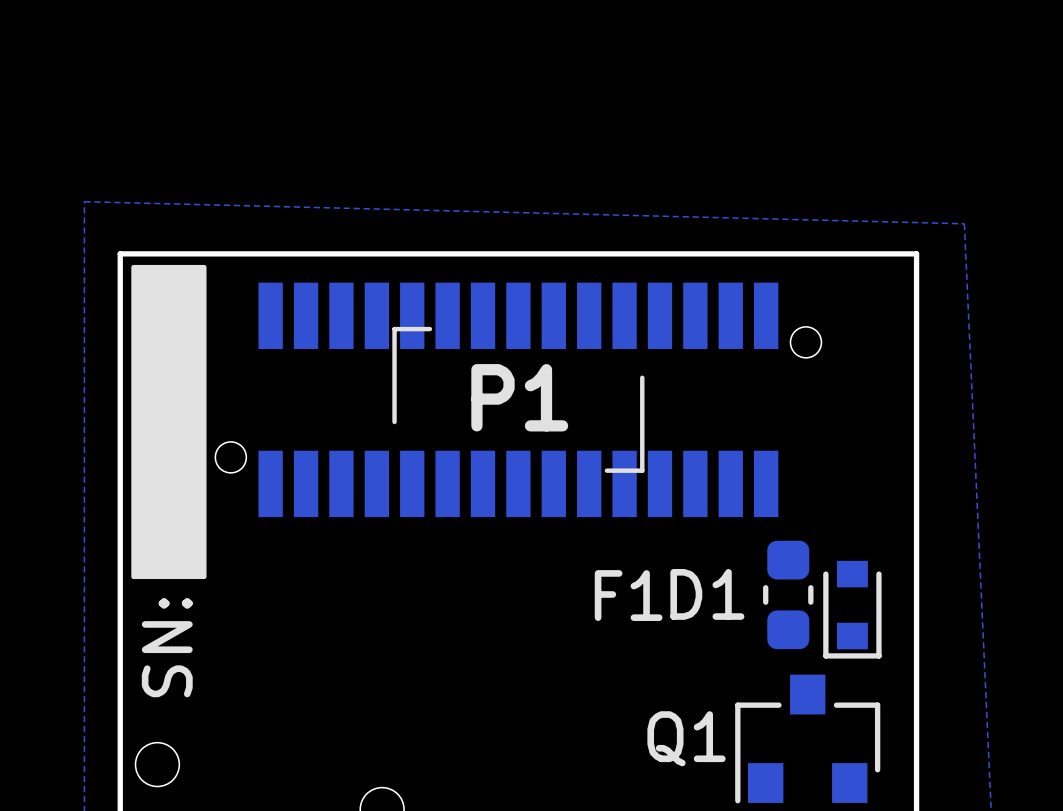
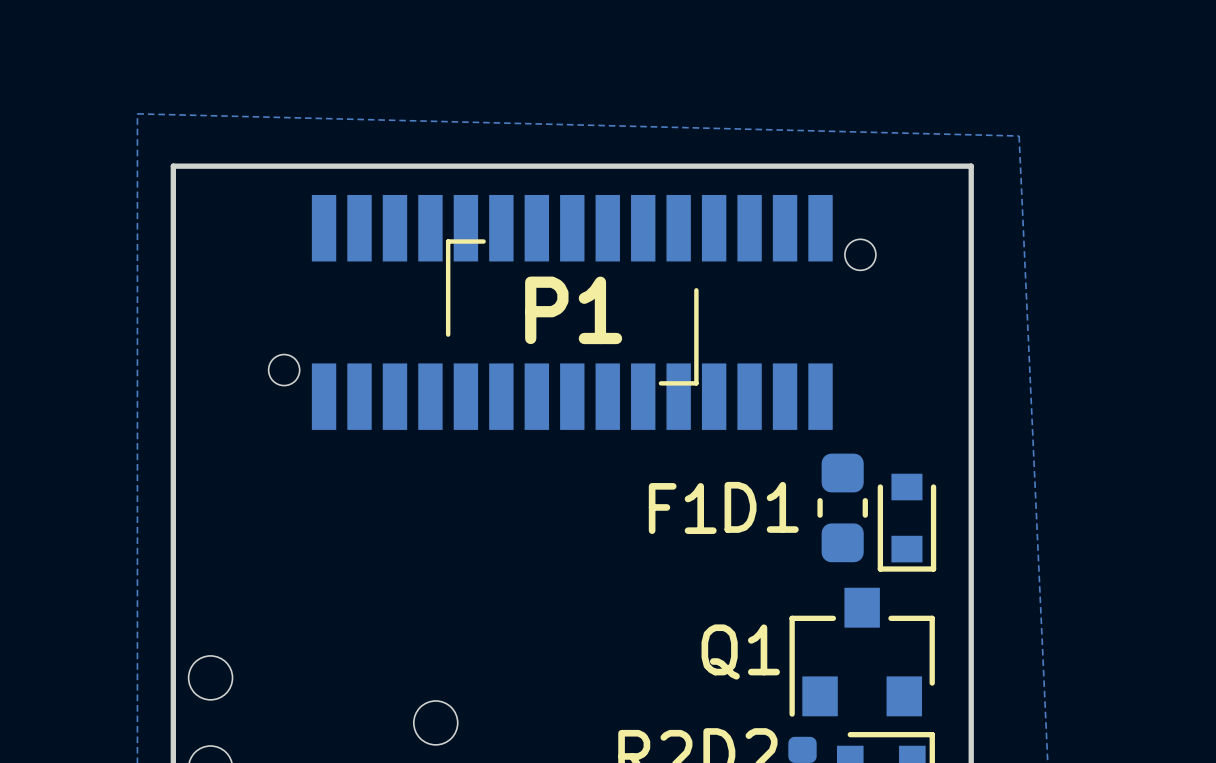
drawing: [131, 264, 207, 580] -> none
text: SN: (167, 647) -> none

